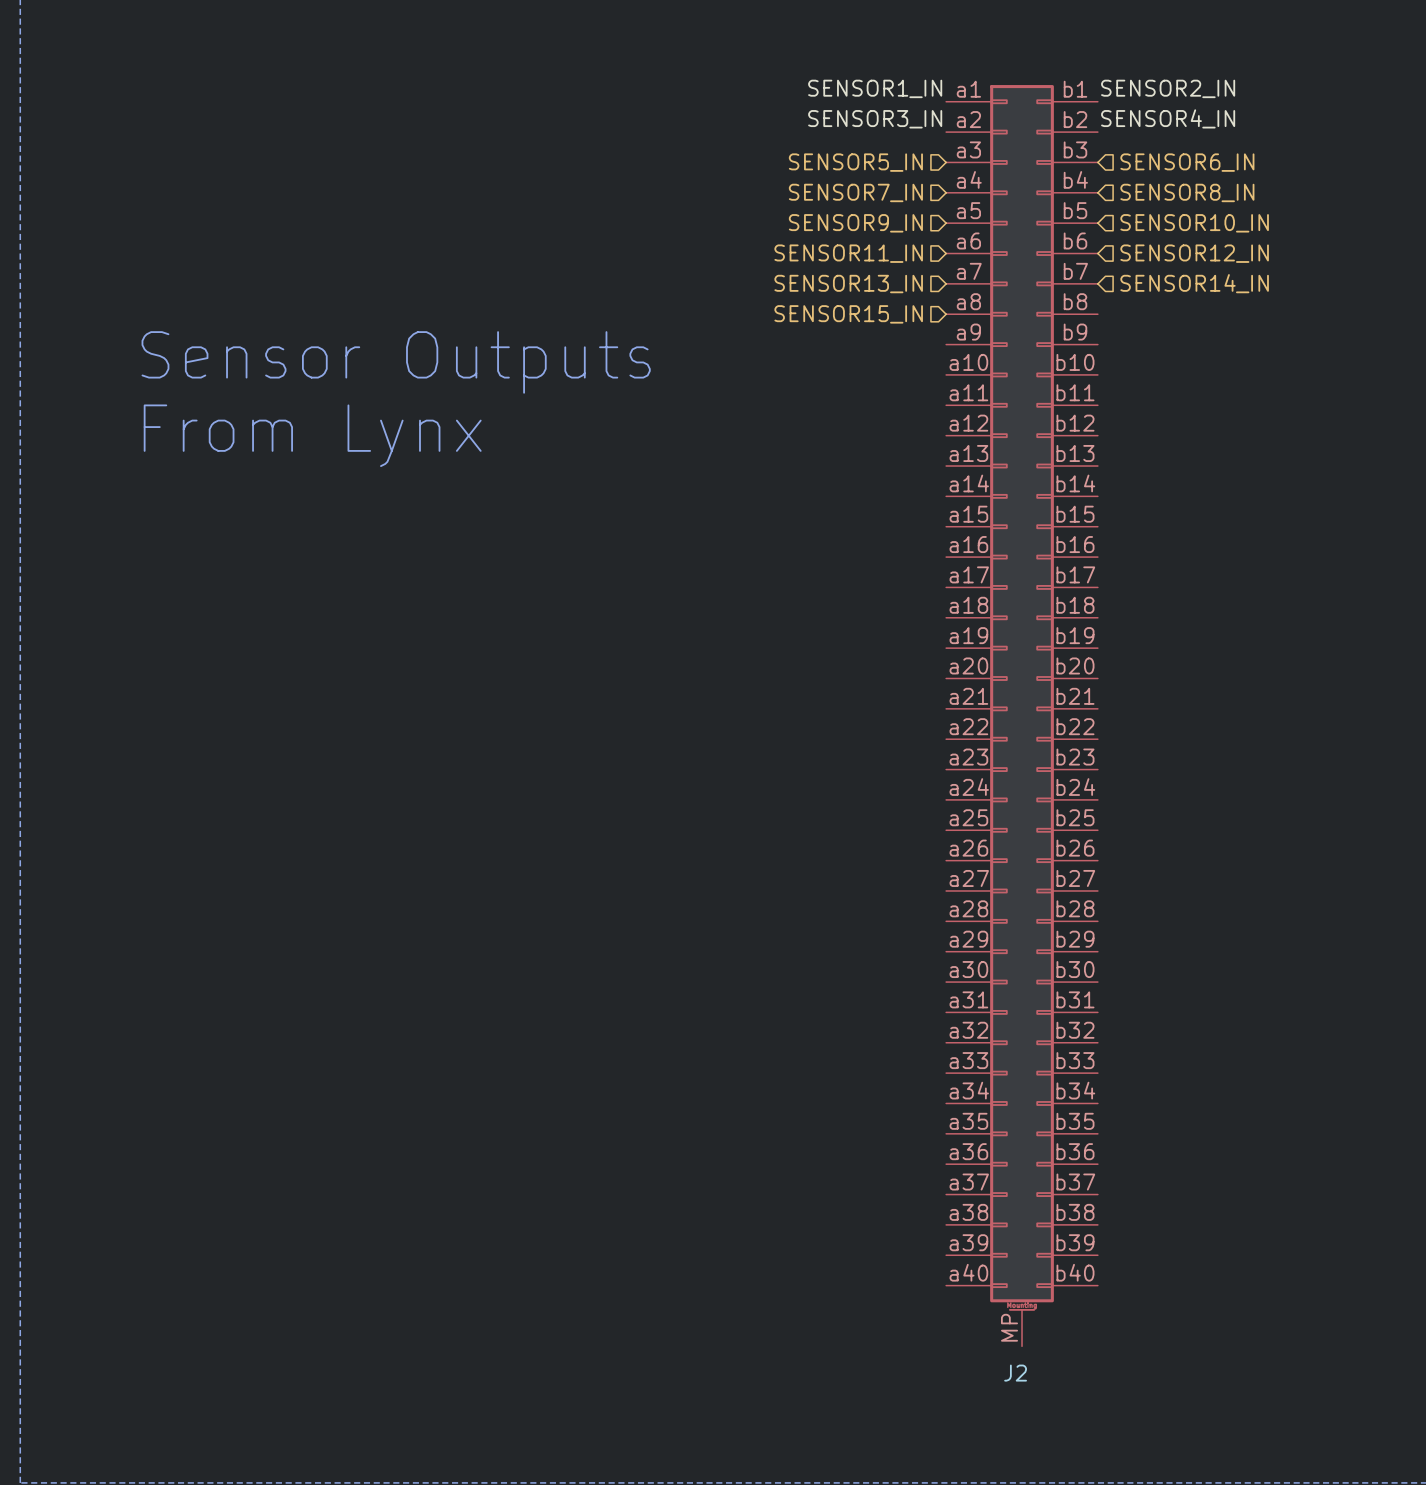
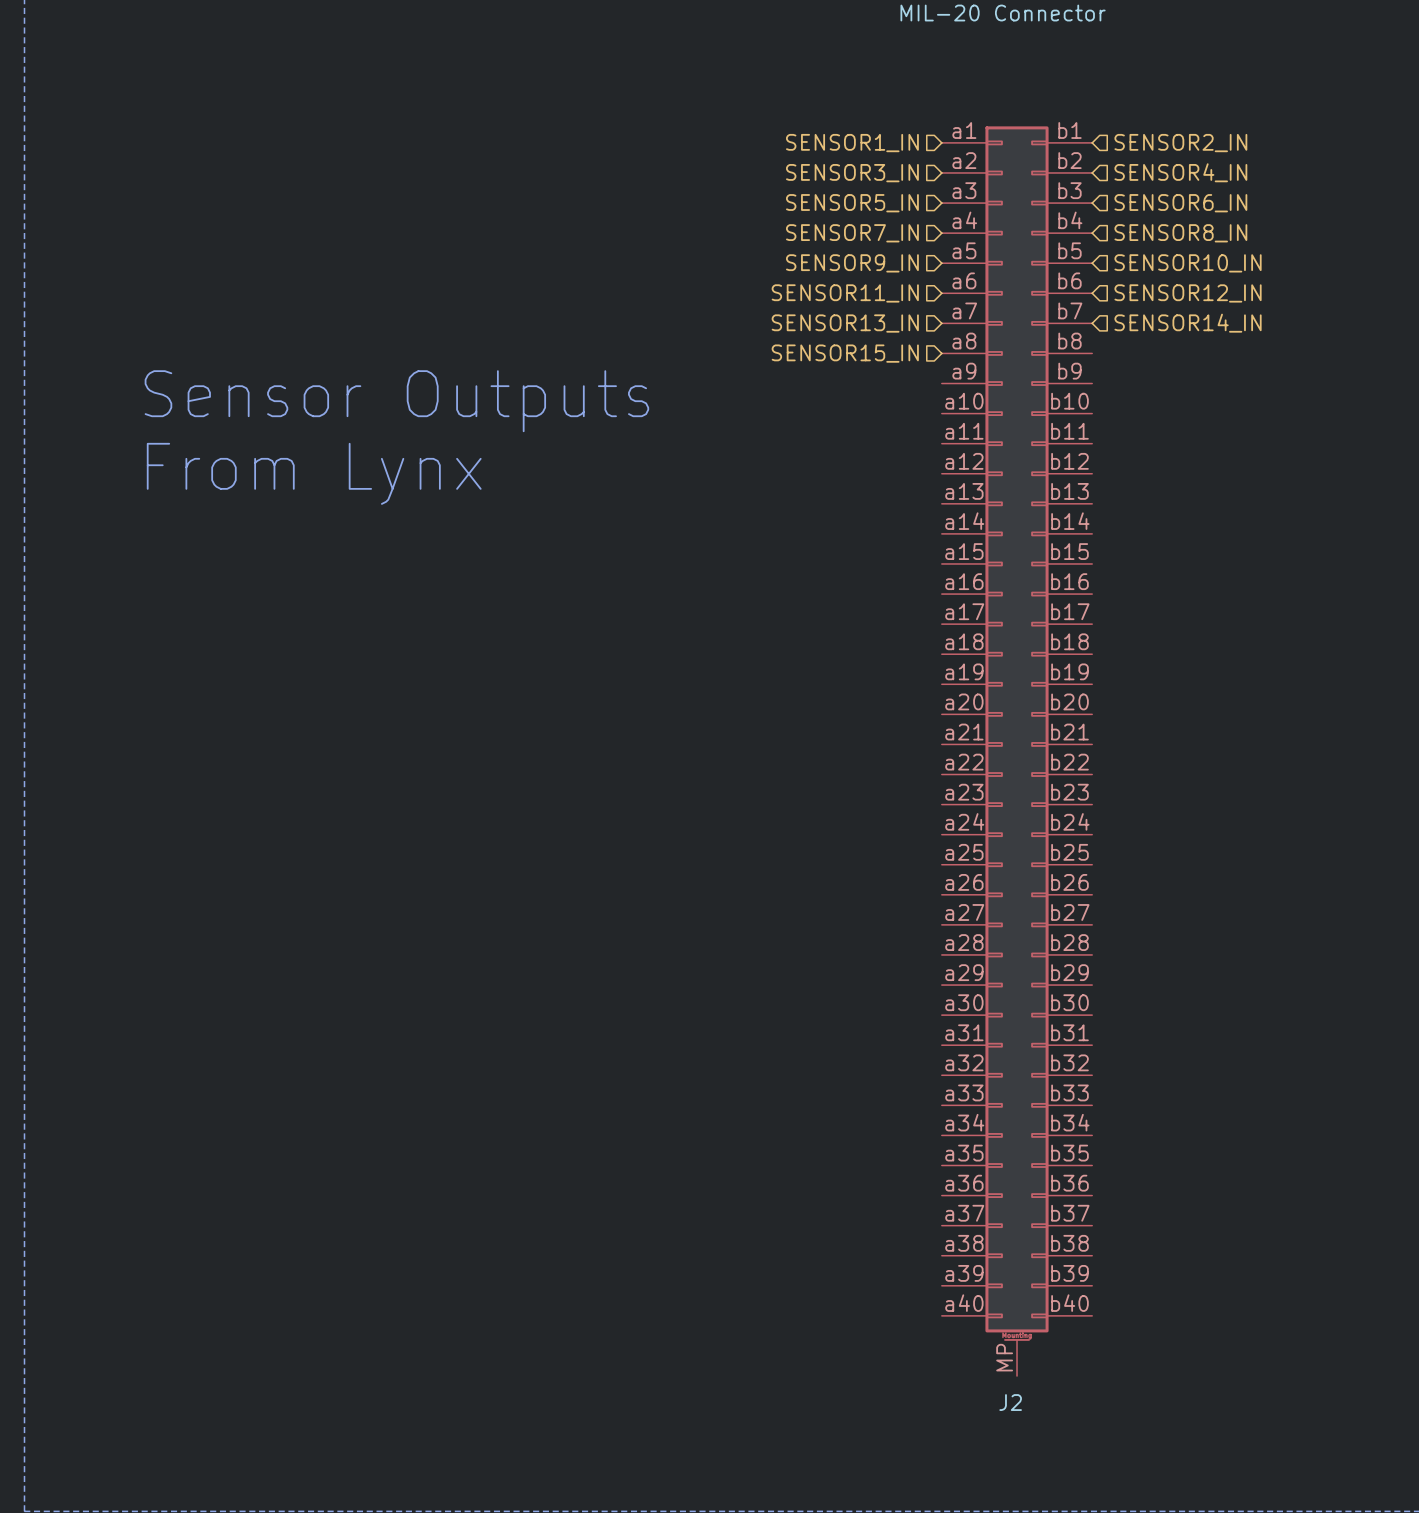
label: SENSOR1_IN (875, 88) -> none
label: SENSOR2_IN (1168, 88) -> none
hierarchical label: none -> SENSOR1_IN (852, 143)
hierarchical label: none -> SENSOR2_IN (1180, 143)
label: SENSOR4_IN (1168, 118) -> none
label: SENSOR3_IN (875, 119) -> none
hierarchical label: none -> SENSOR4_IN (1180, 172)
hierarchical label: none -> SENSOR3_IN (852, 173)

